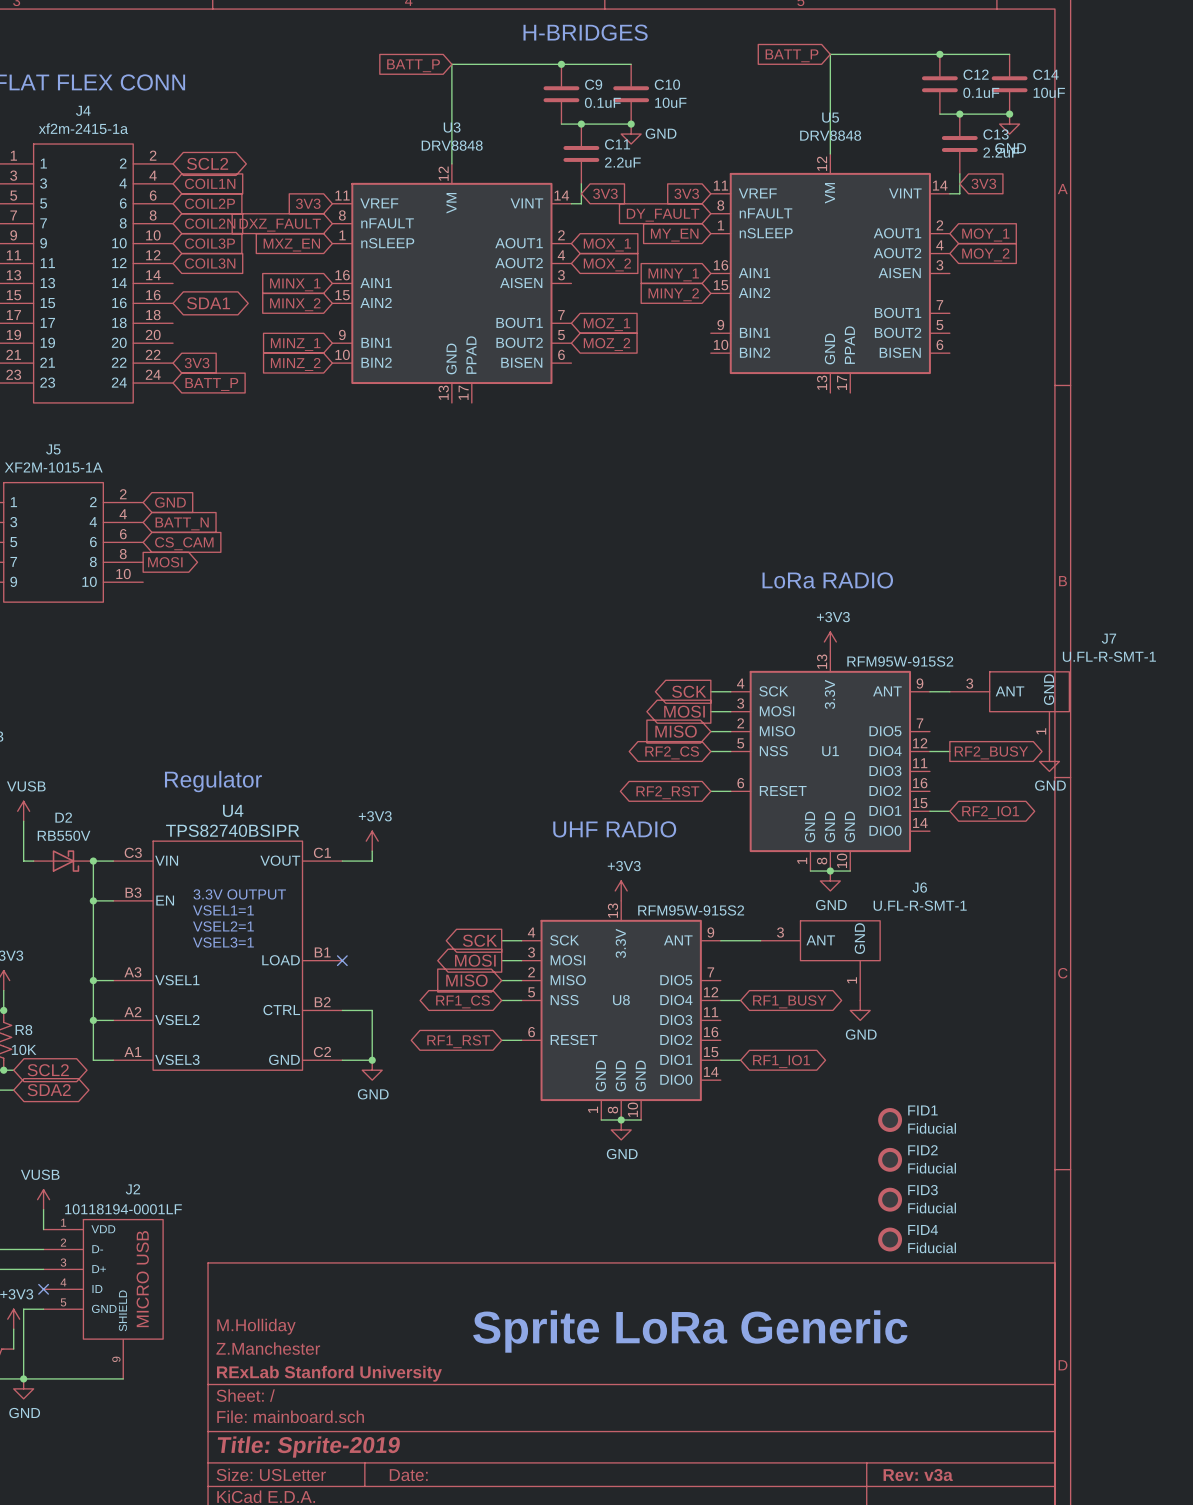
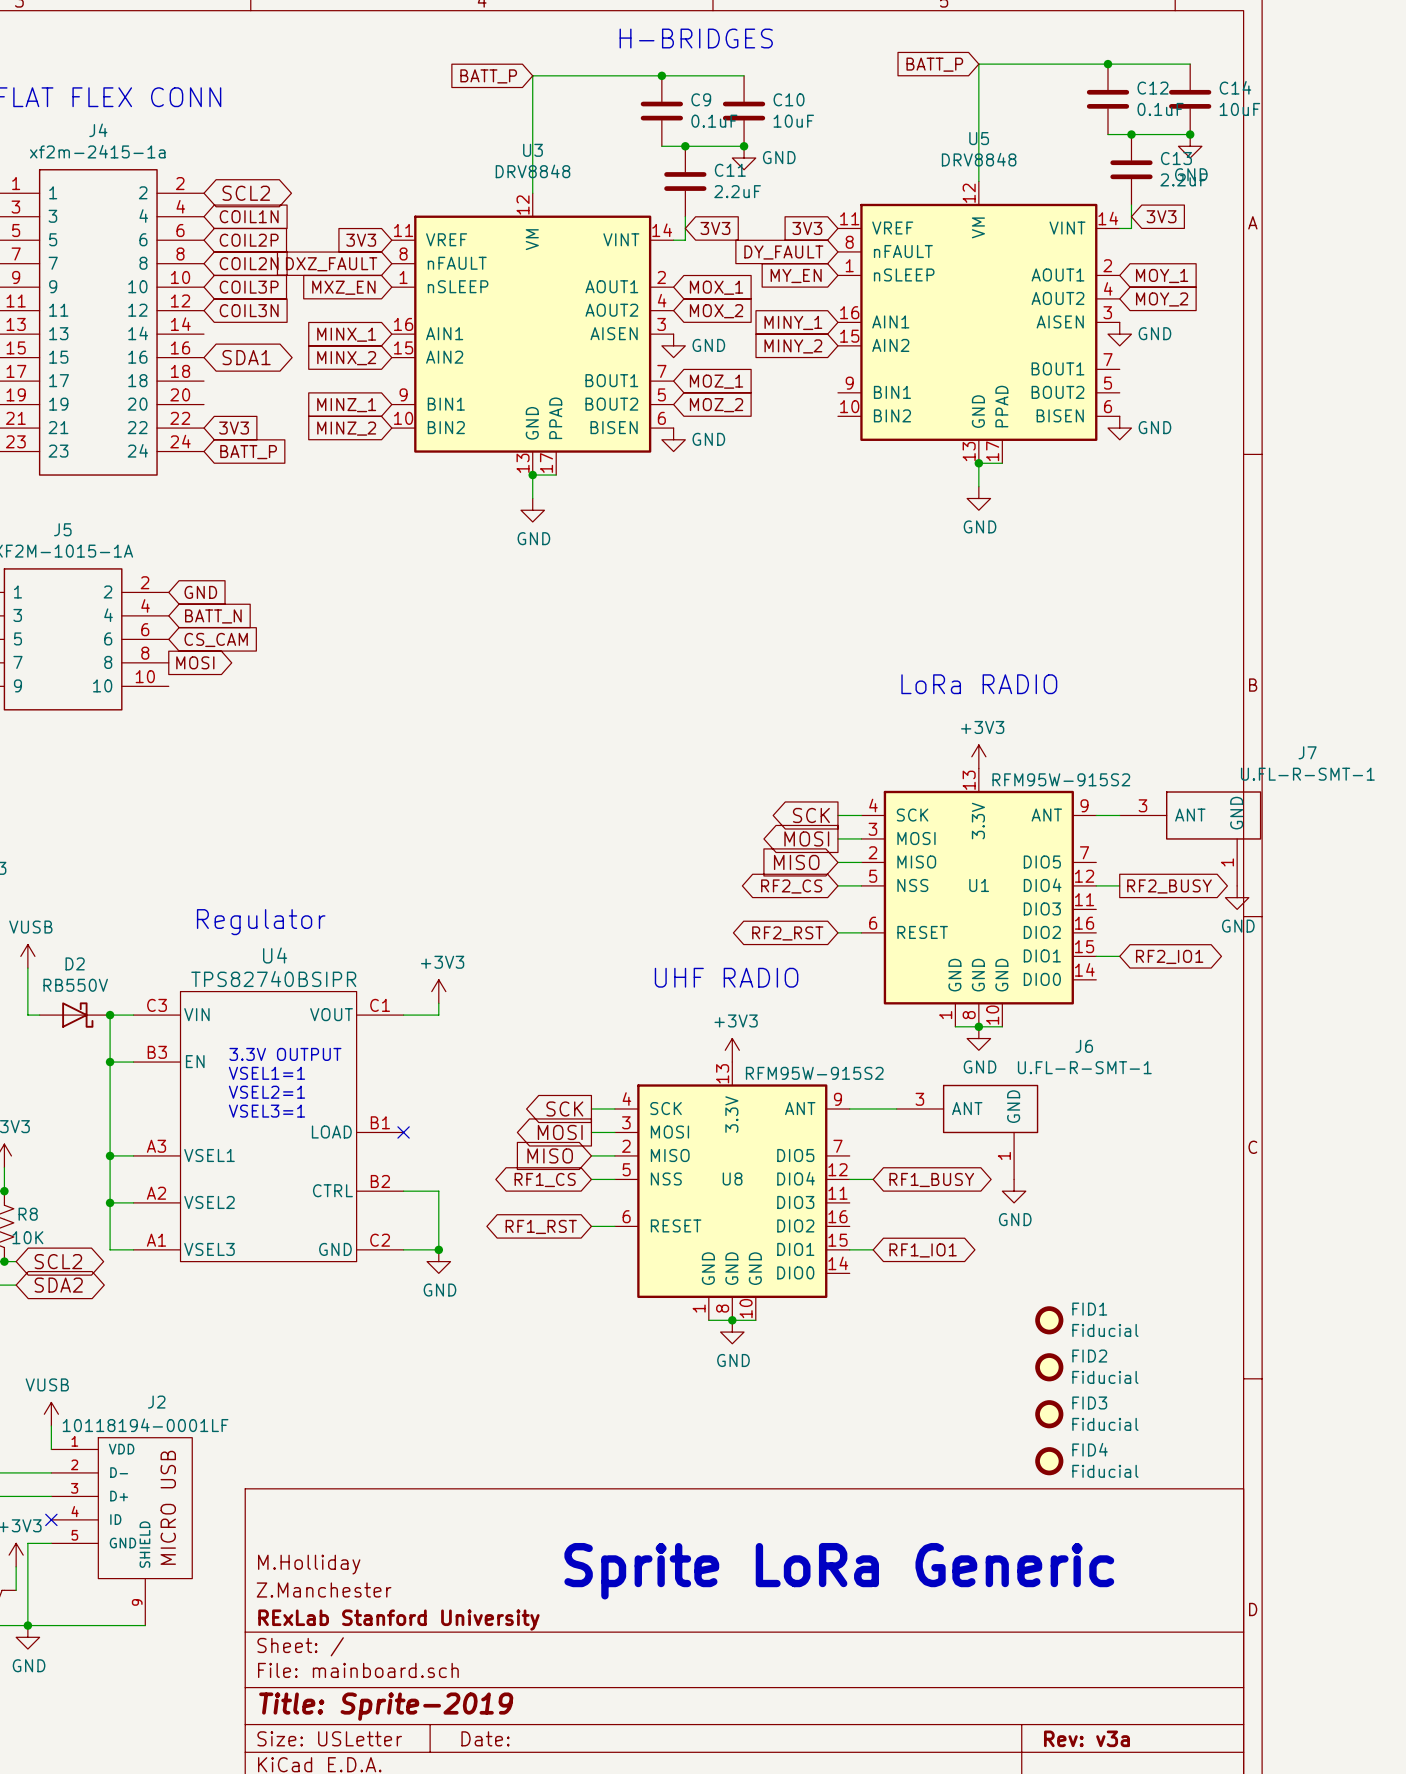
power symbol: none -> GND (1119, 334)
power symbol: none -> GND (673, 345)
power symbol: none -> GND (1119, 428)
power symbol: none -> GND (673, 439)
junction: none -> (978, 463)
wire: none -> (1002, 463) (978, 463) (978, 486)
junction: none -> (532, 475)
wire: none -> (556, 475) (532, 475) (532, 498)
power symbol: none -> GND (978, 498)
power symbol: none -> GND (532, 510)

